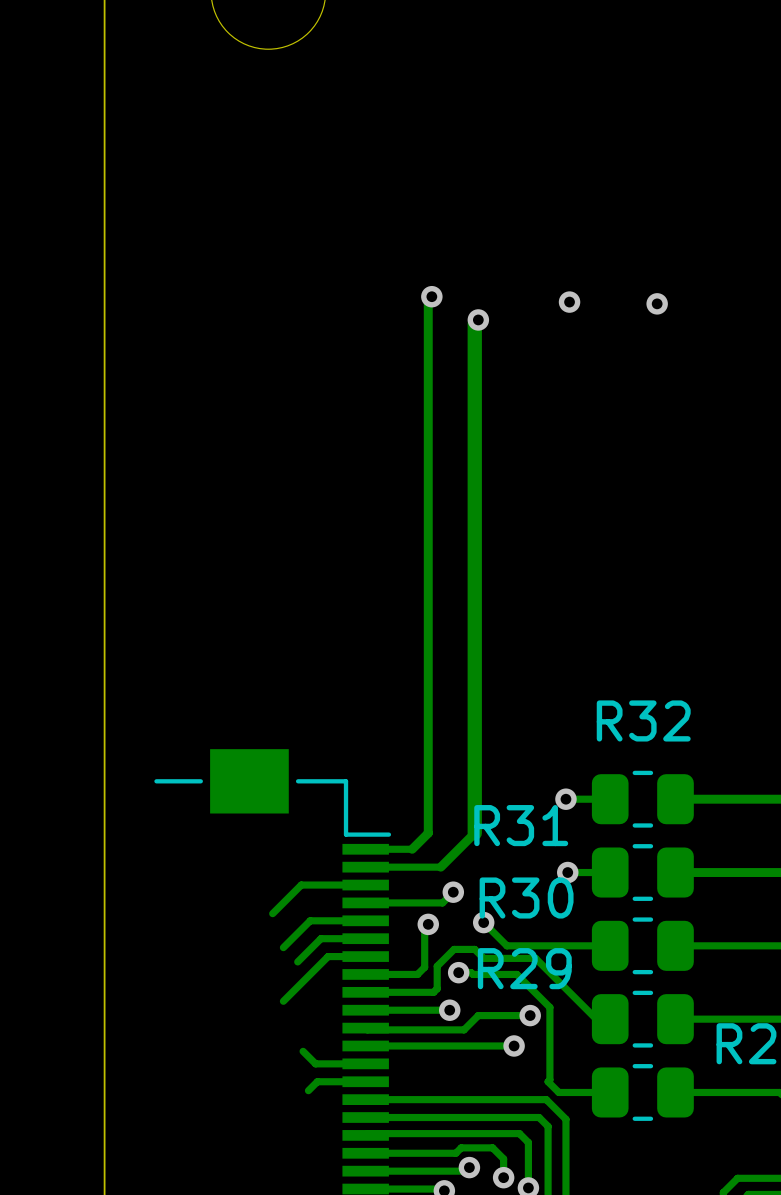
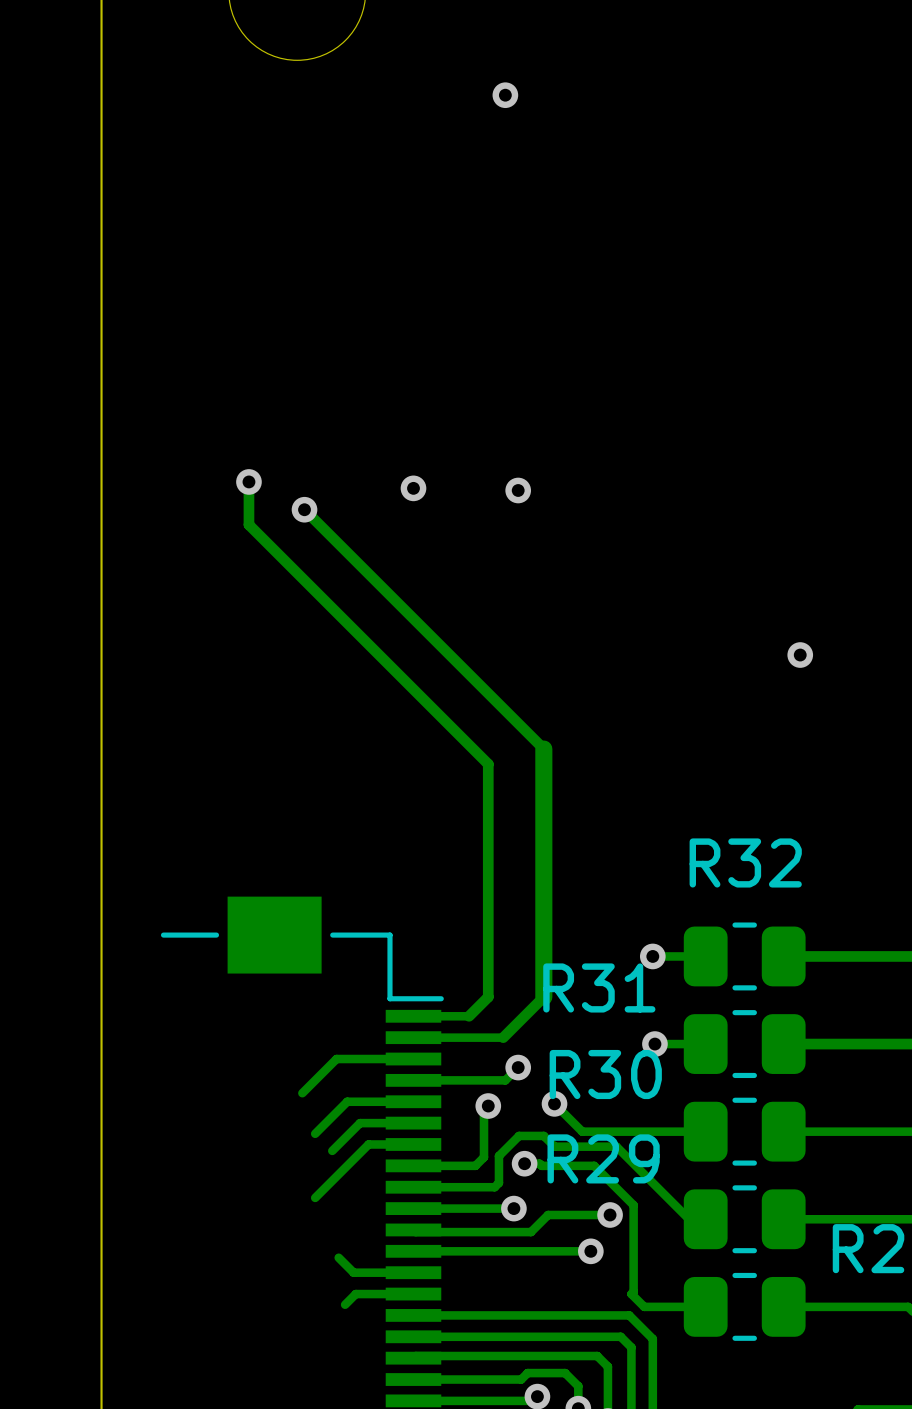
via: none -> (505, 95)
track: (431, 296) (428, 300) (428, 638) -> (244, 486) (248, 481) (248, 524) (488, 764)
via: (431, 296) -> none
via: (569, 302) -> none
via: (657, 303) -> none
track: (478, 319) (474, 323) (474, 625) -> (300, 514) (304, 509) (543, 749)
via: (478, 319) -> none
via: none -> (248, 481)
via: none -> (413, 488)
via: none -> (518, 490)
via: none -> (304, 509)
via: none -> (800, 655)

